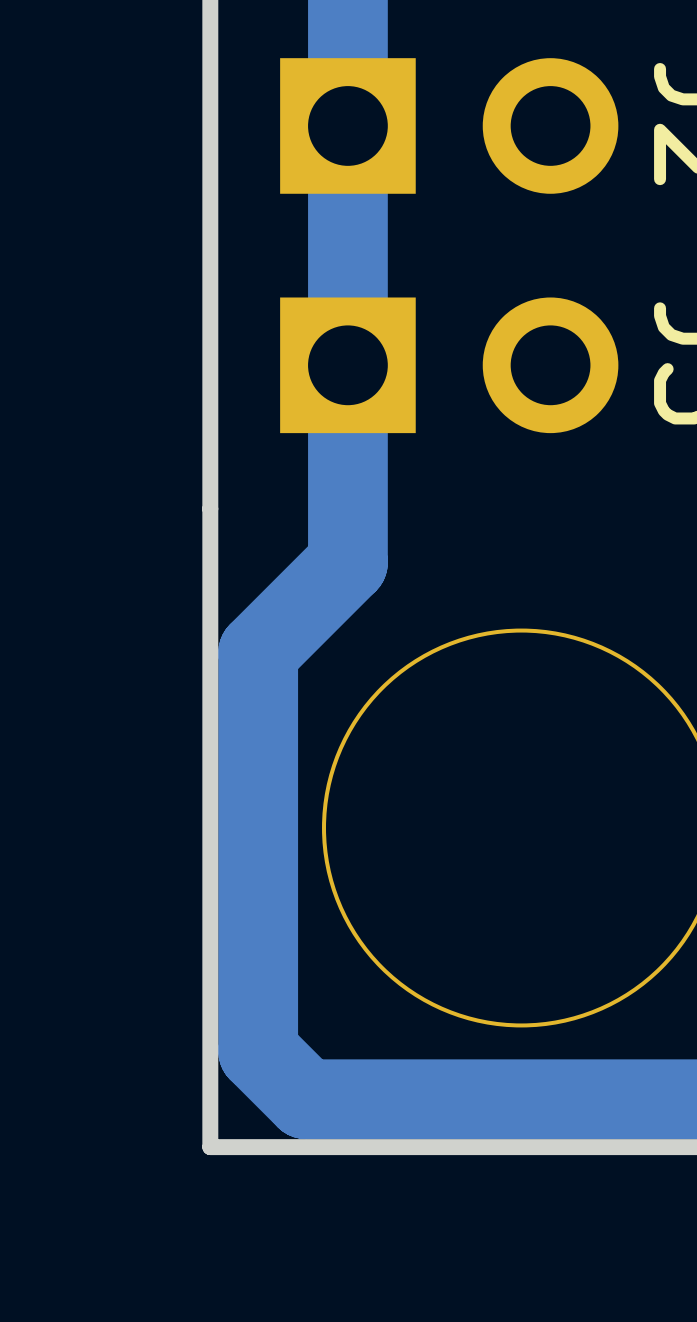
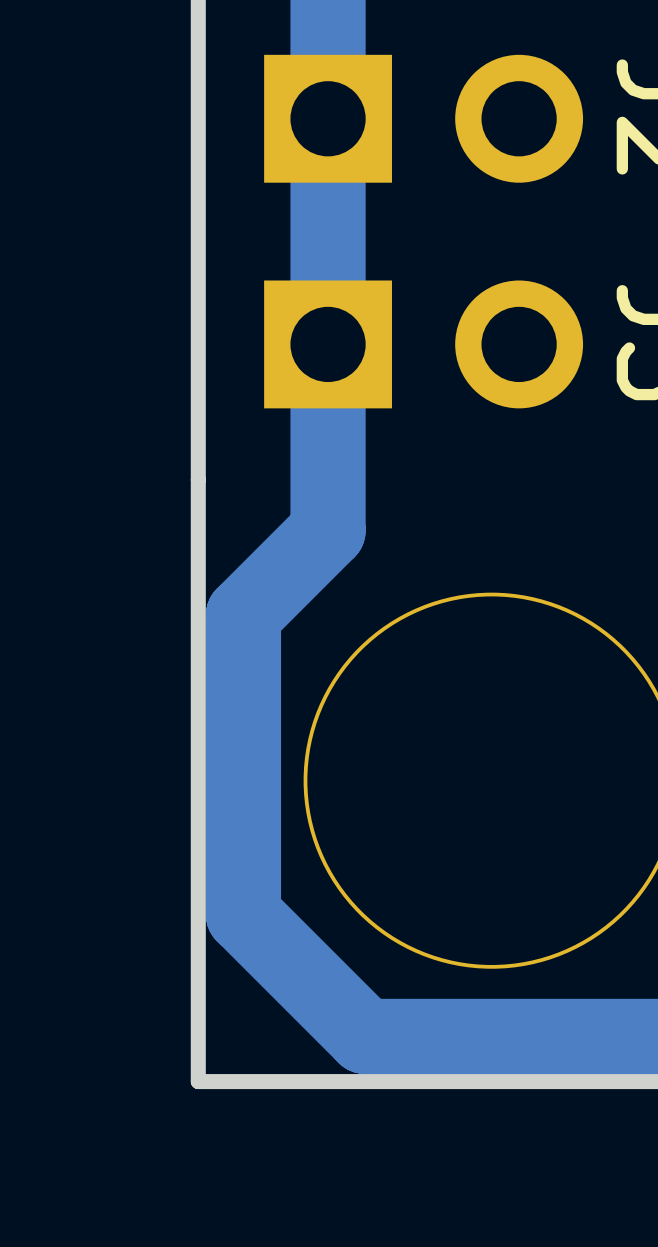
track: (258, 970) (258, 1051) (306, 1099) (387, 1099) -> (243, 914) (365, 1036)

